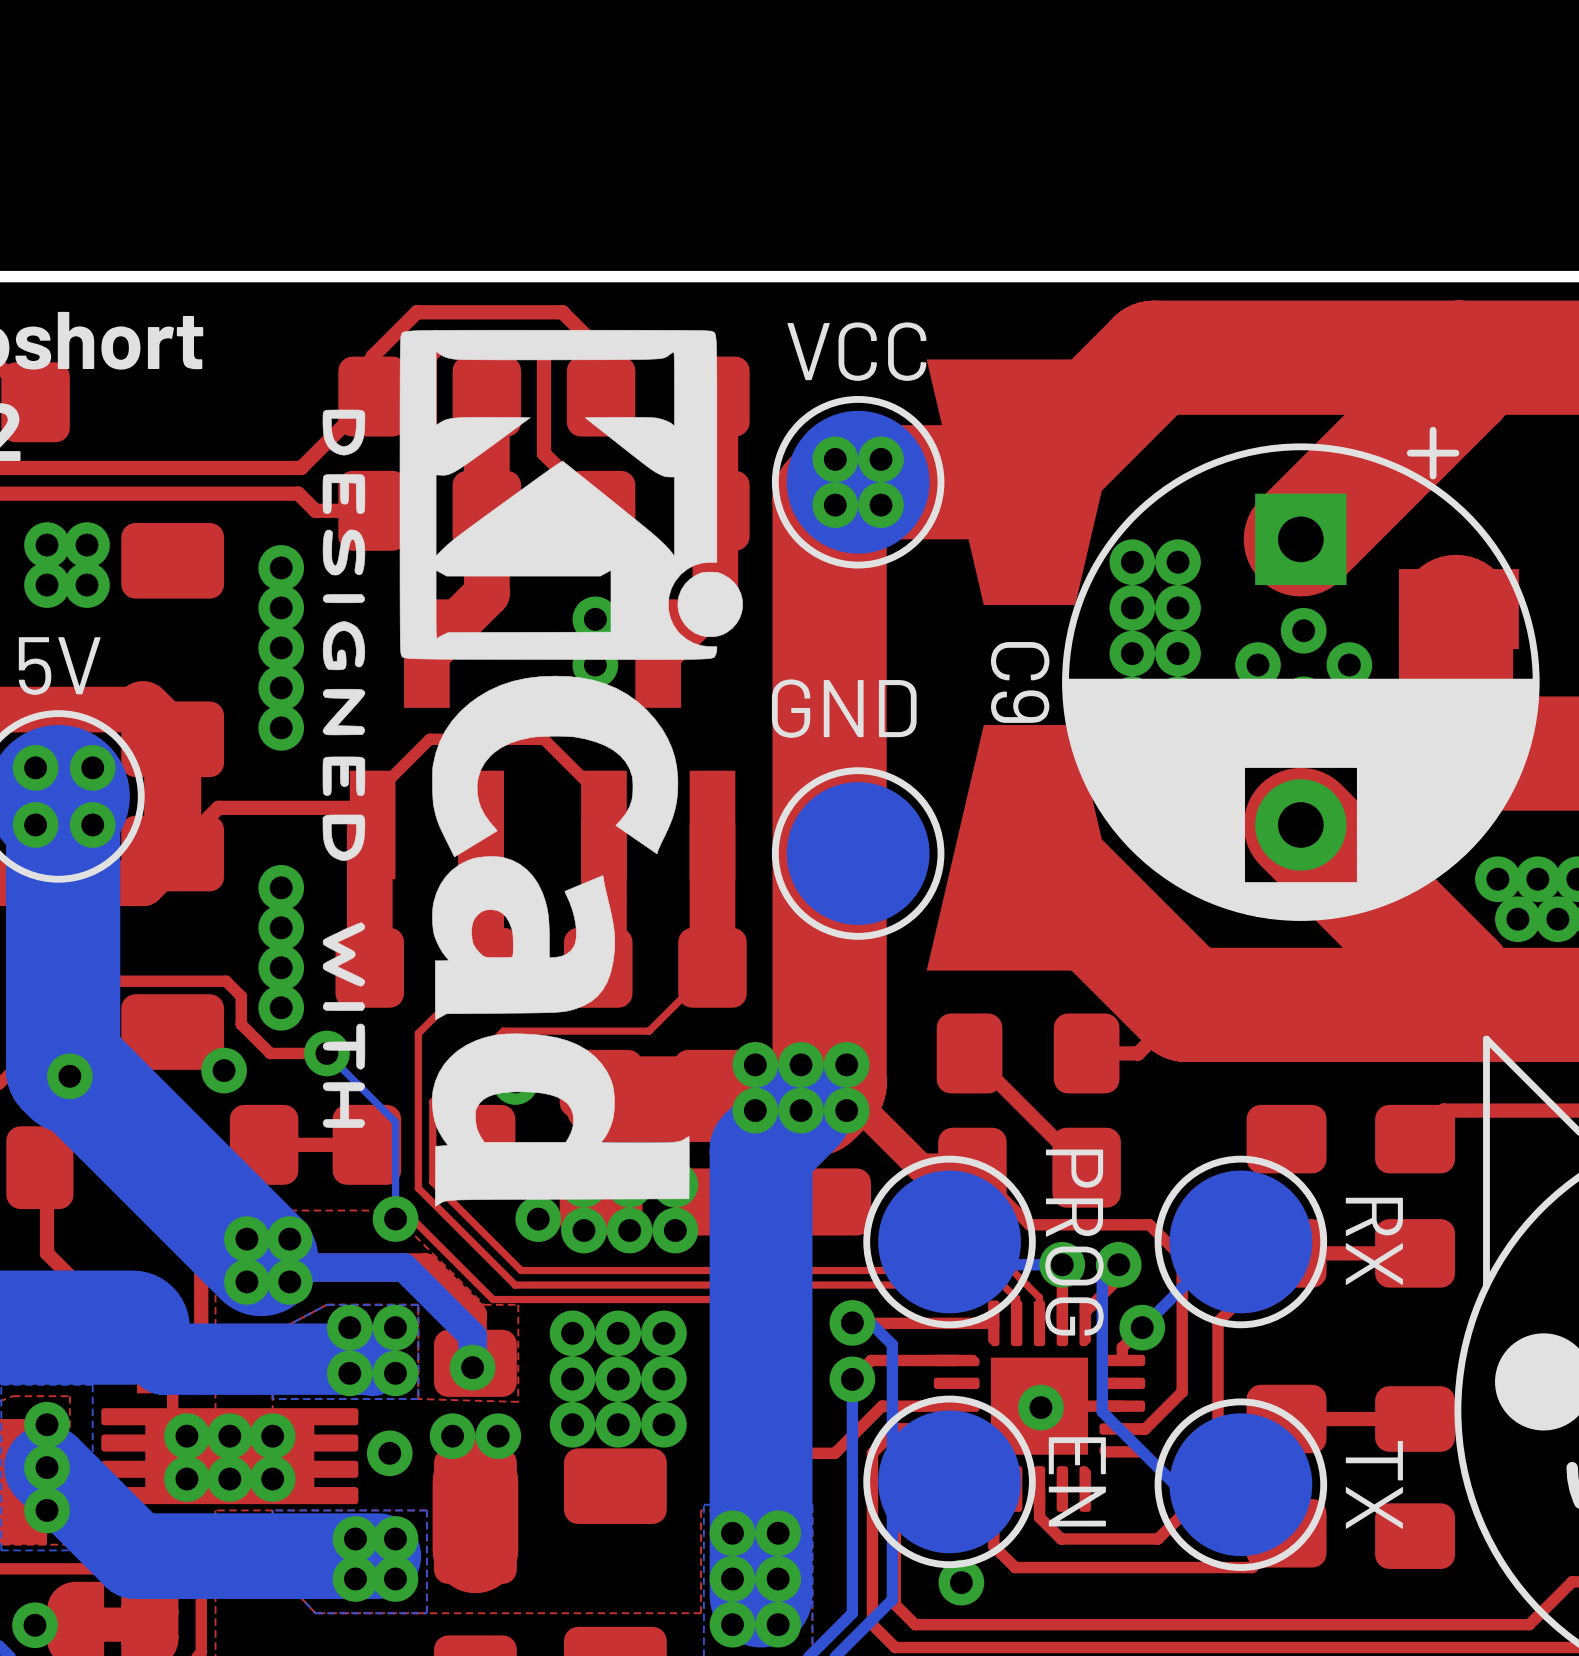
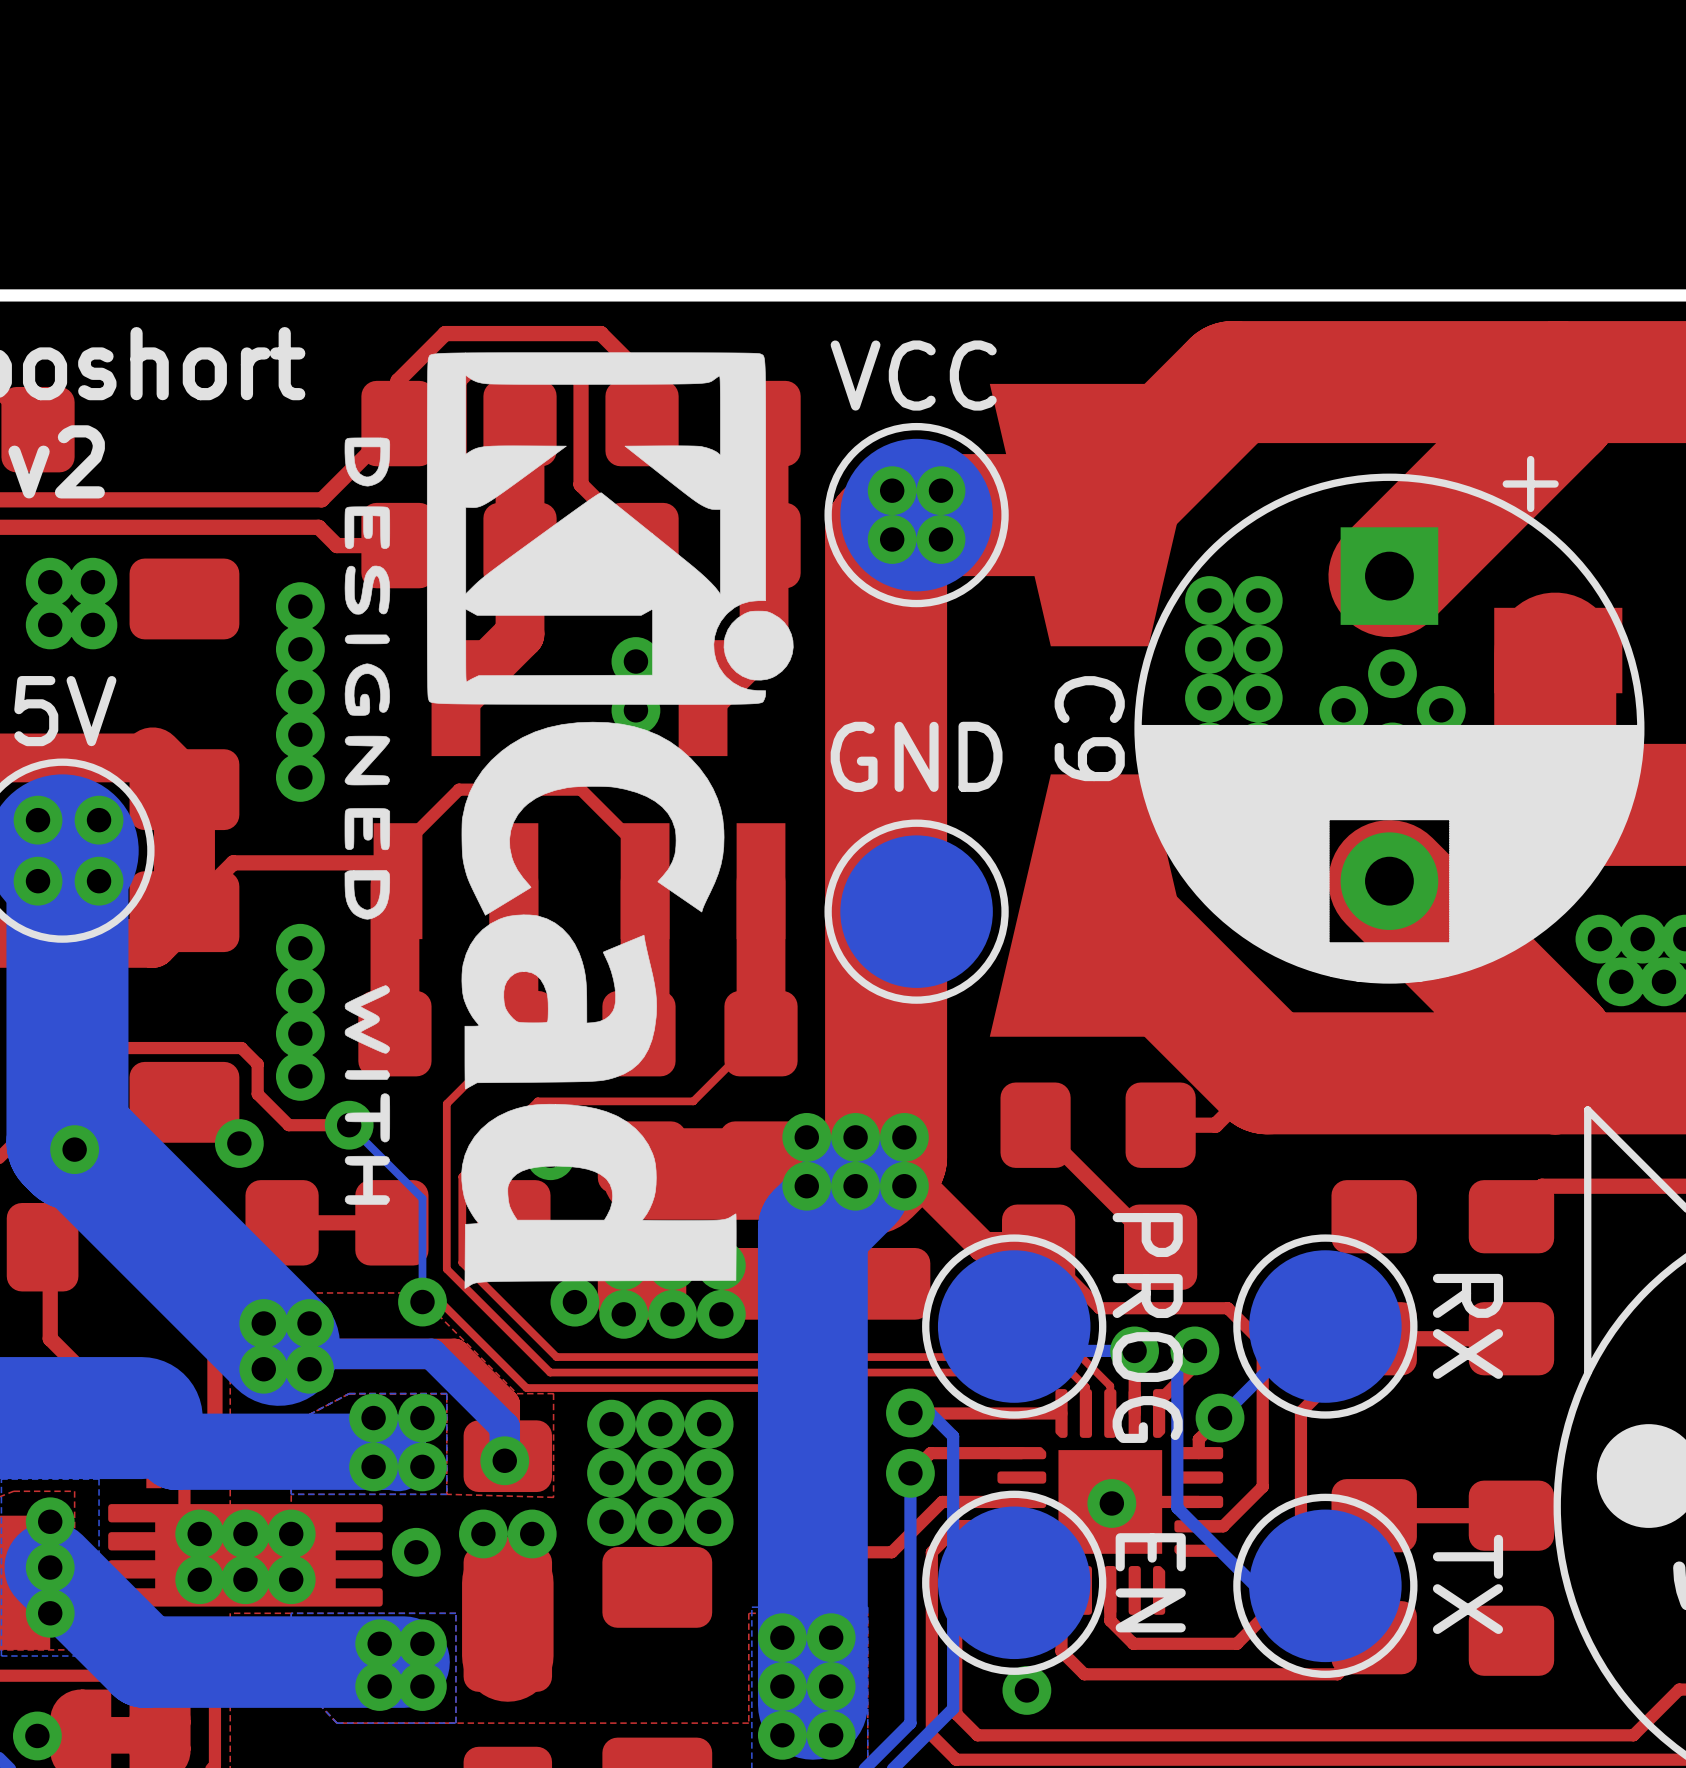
part value position: GND (844, 708) -> GND (916, 756)

